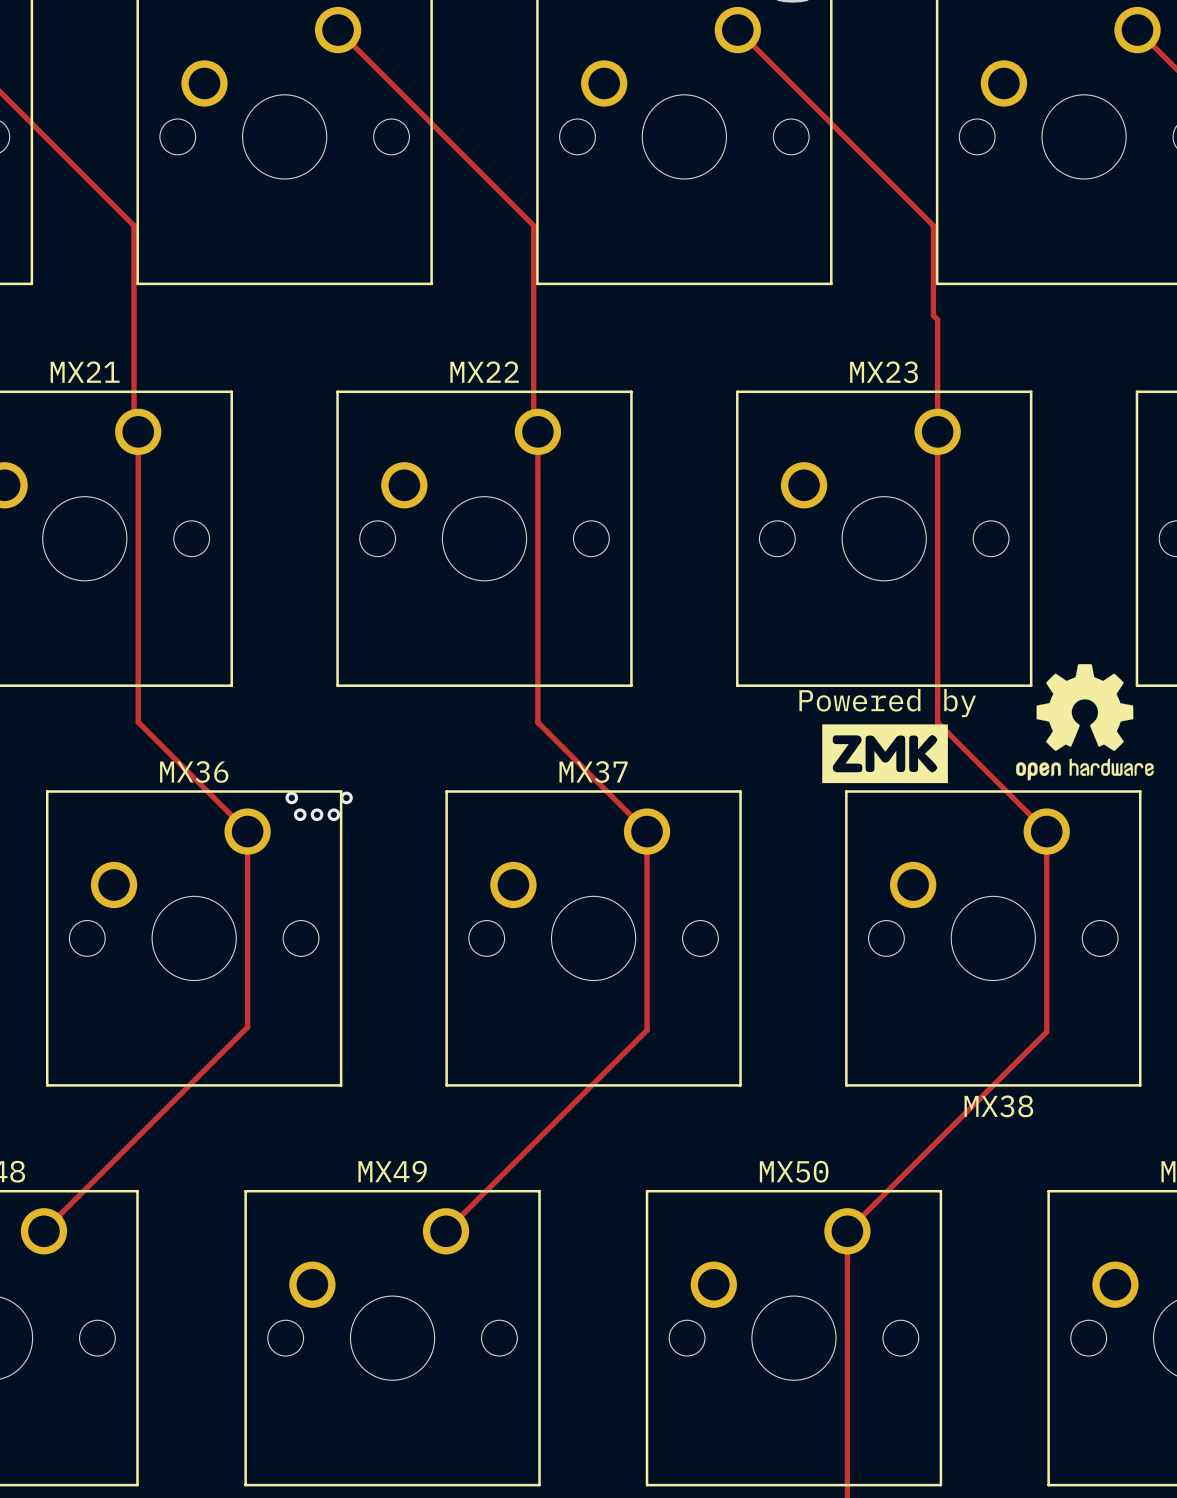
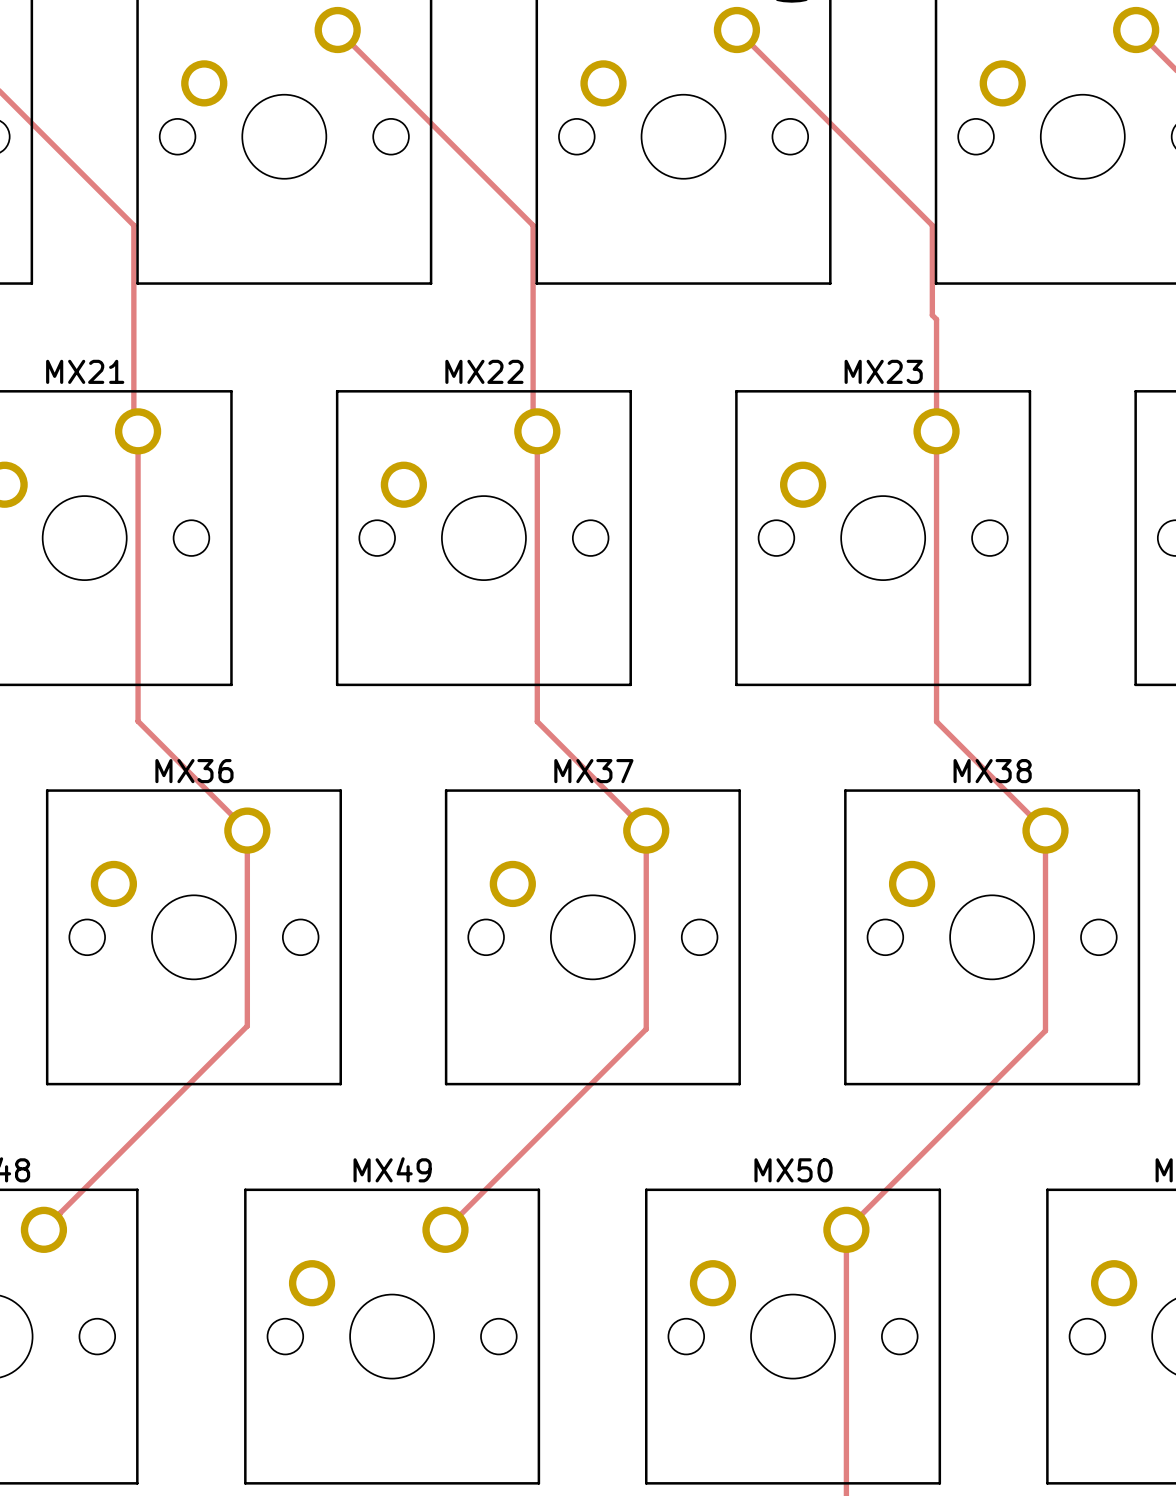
drawing: [1016, 664, 1154, 781] -> none
text: Powered by (887, 703) -> none
drawing: [822, 724, 948, 784] -> none
via: (291, 797) -> none
via: (346, 797) -> none
via: (300, 814) -> none
via: (317, 814) -> none
via: (333, 814) -> none
MX38 name position: MX38 (998, 1106) -> MX38 (992, 771)

